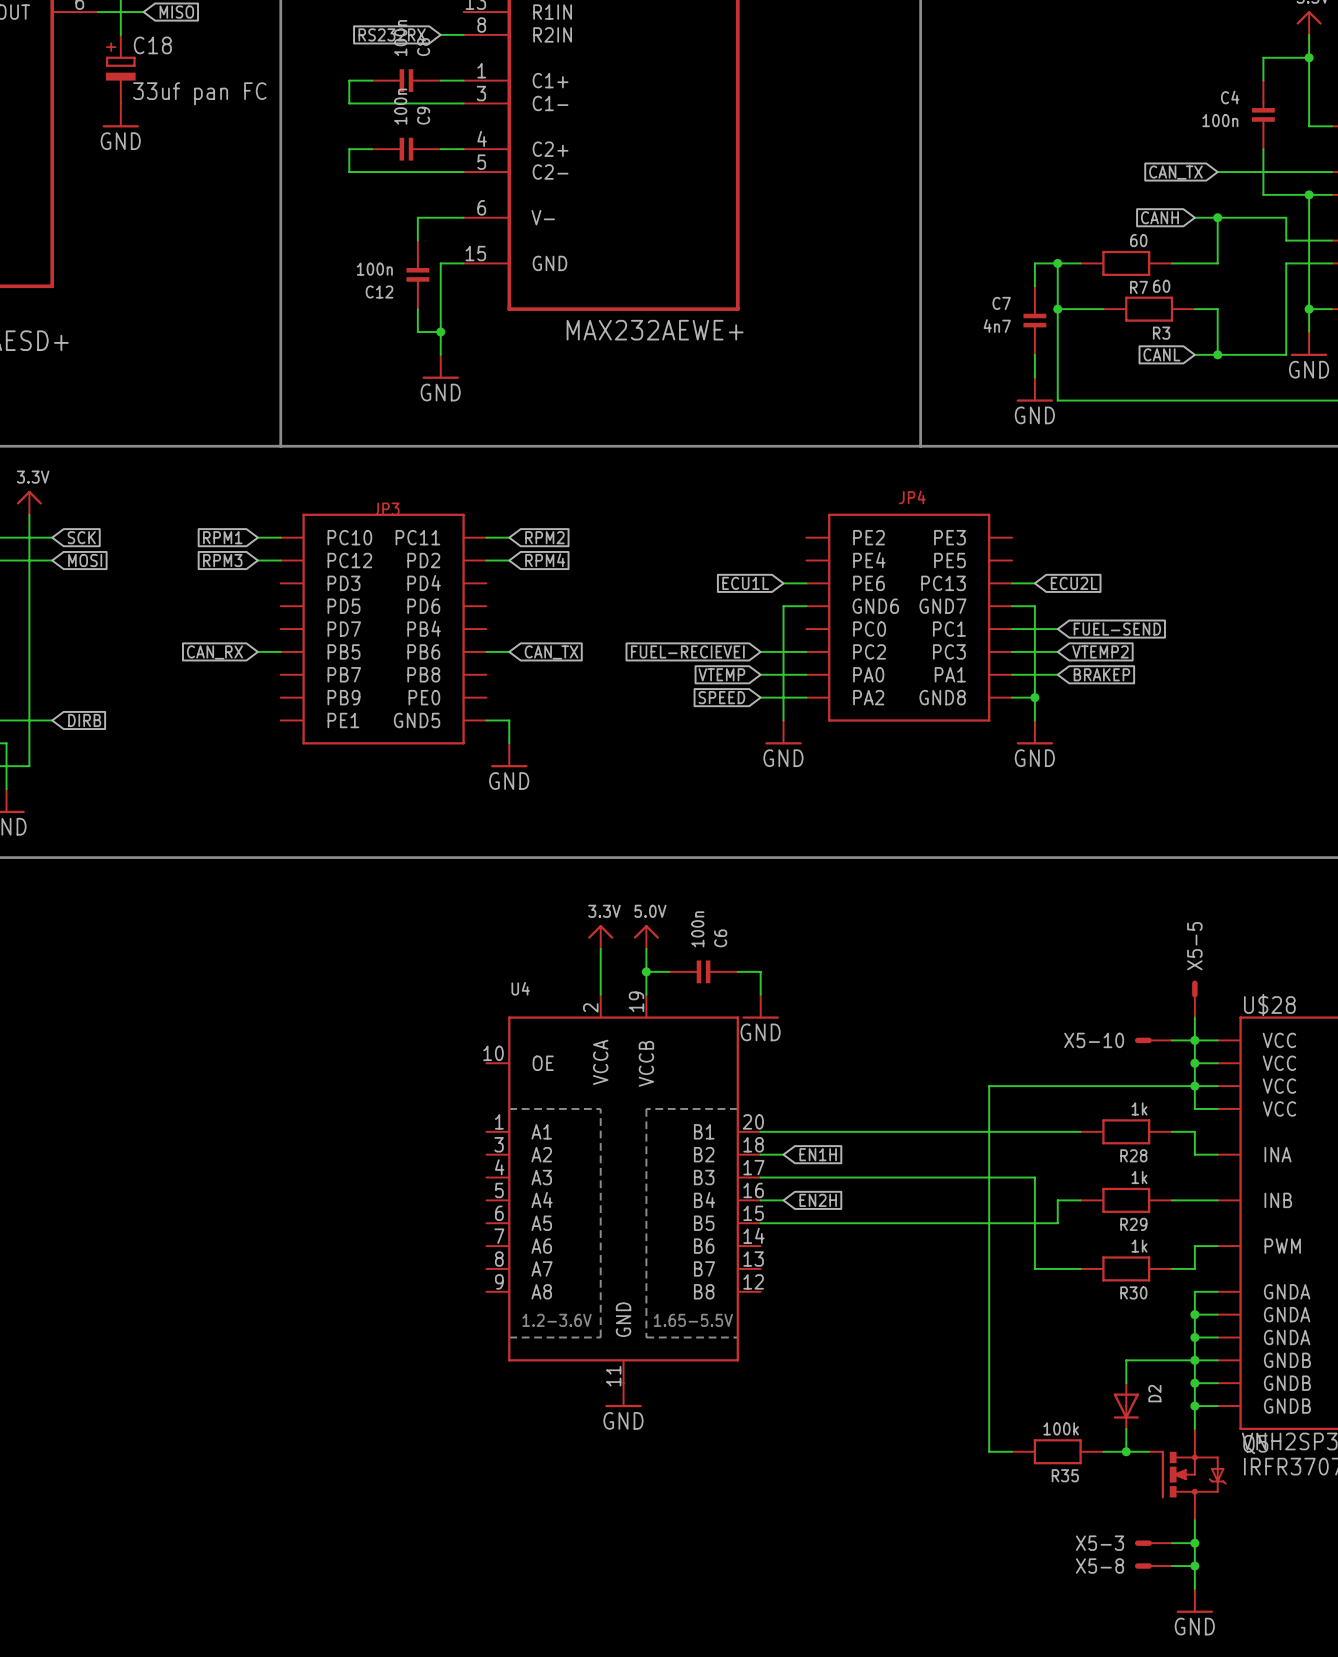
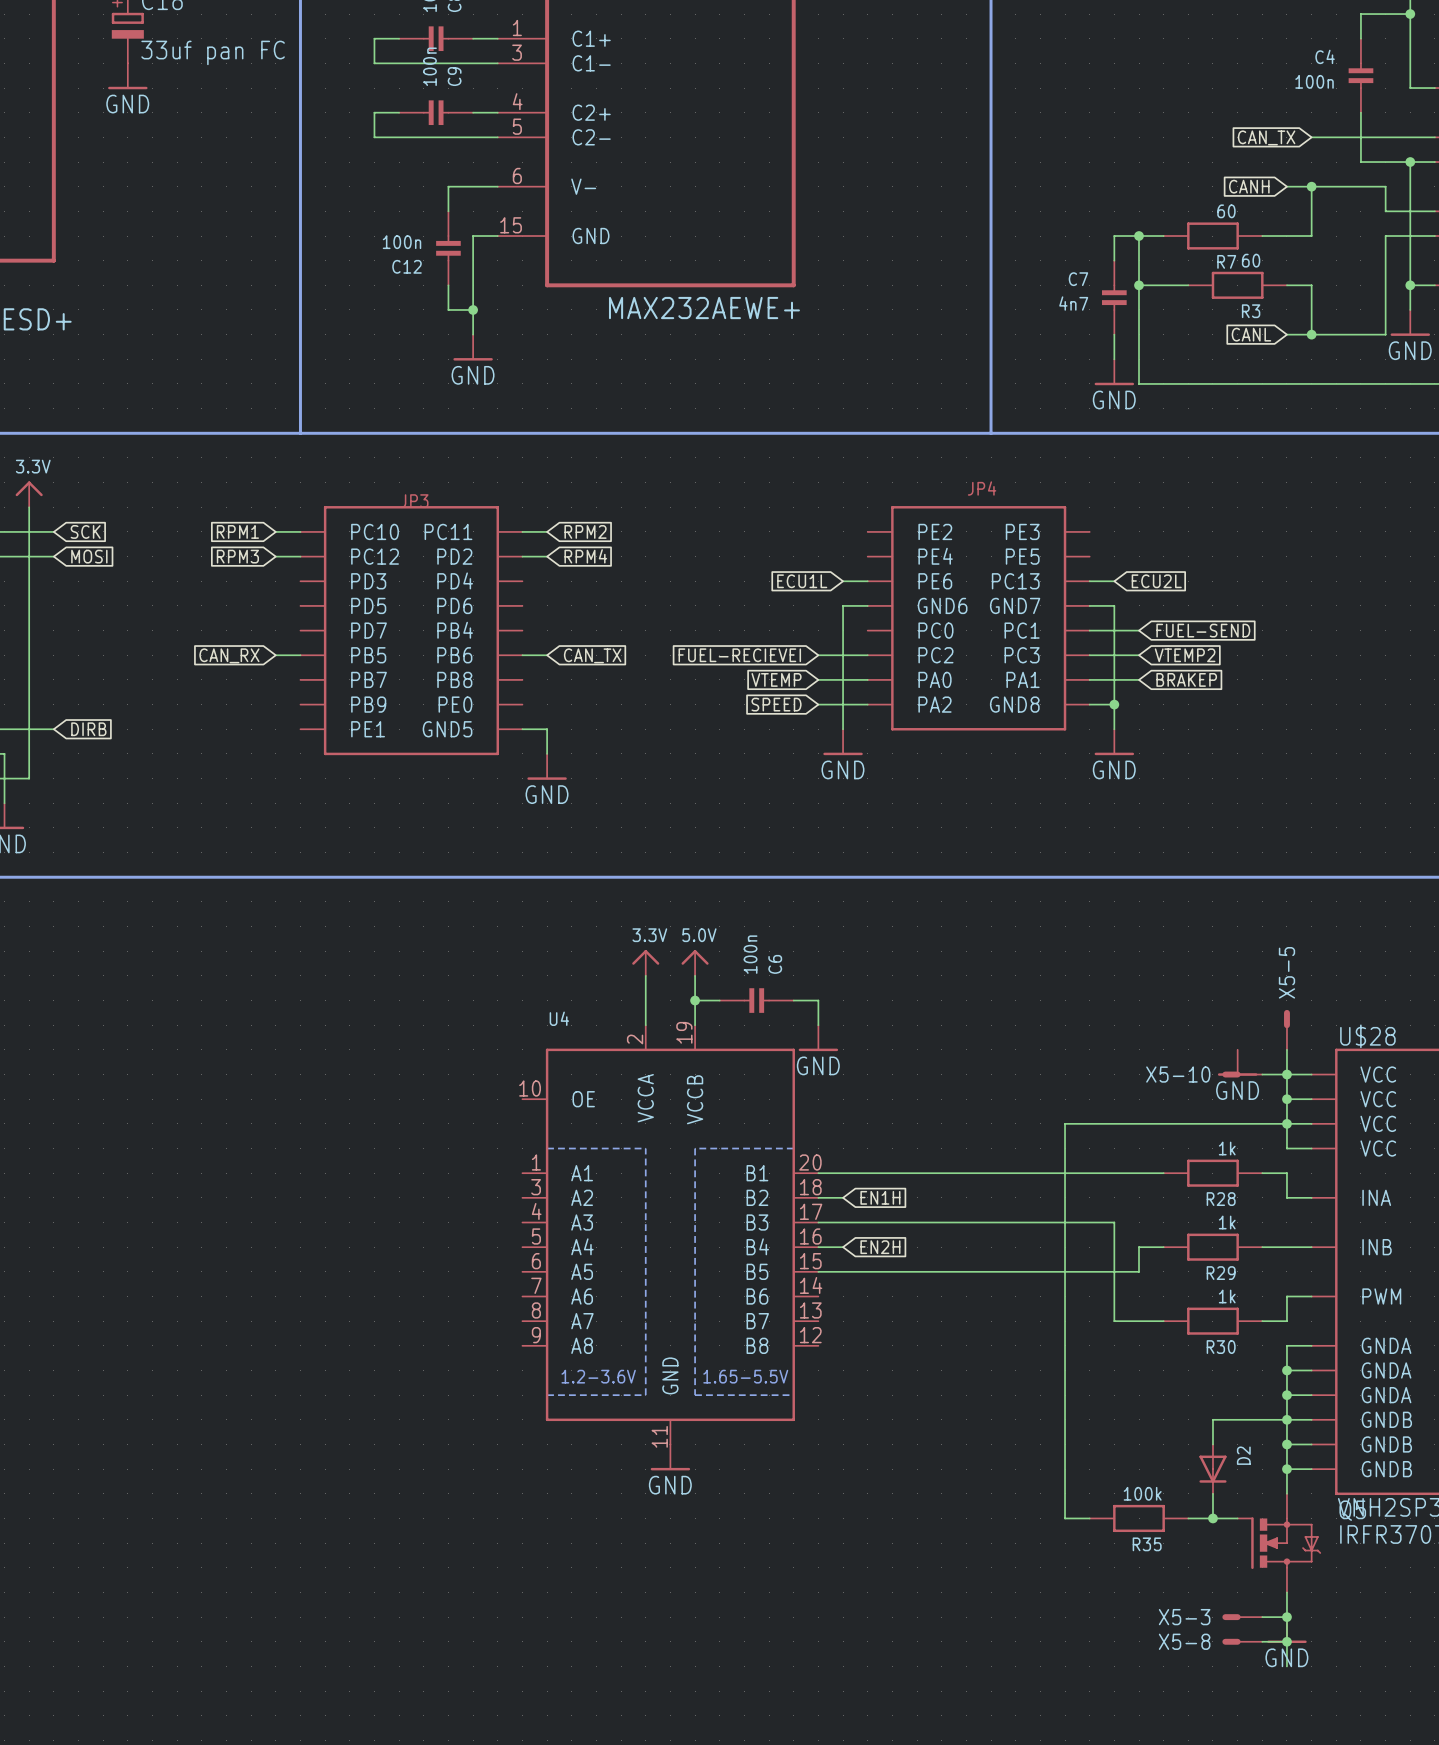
power symbol: none -> GND (1237, 1062)
power symbol position: GND (1194, 1600) -> GND (1286, 1630)

